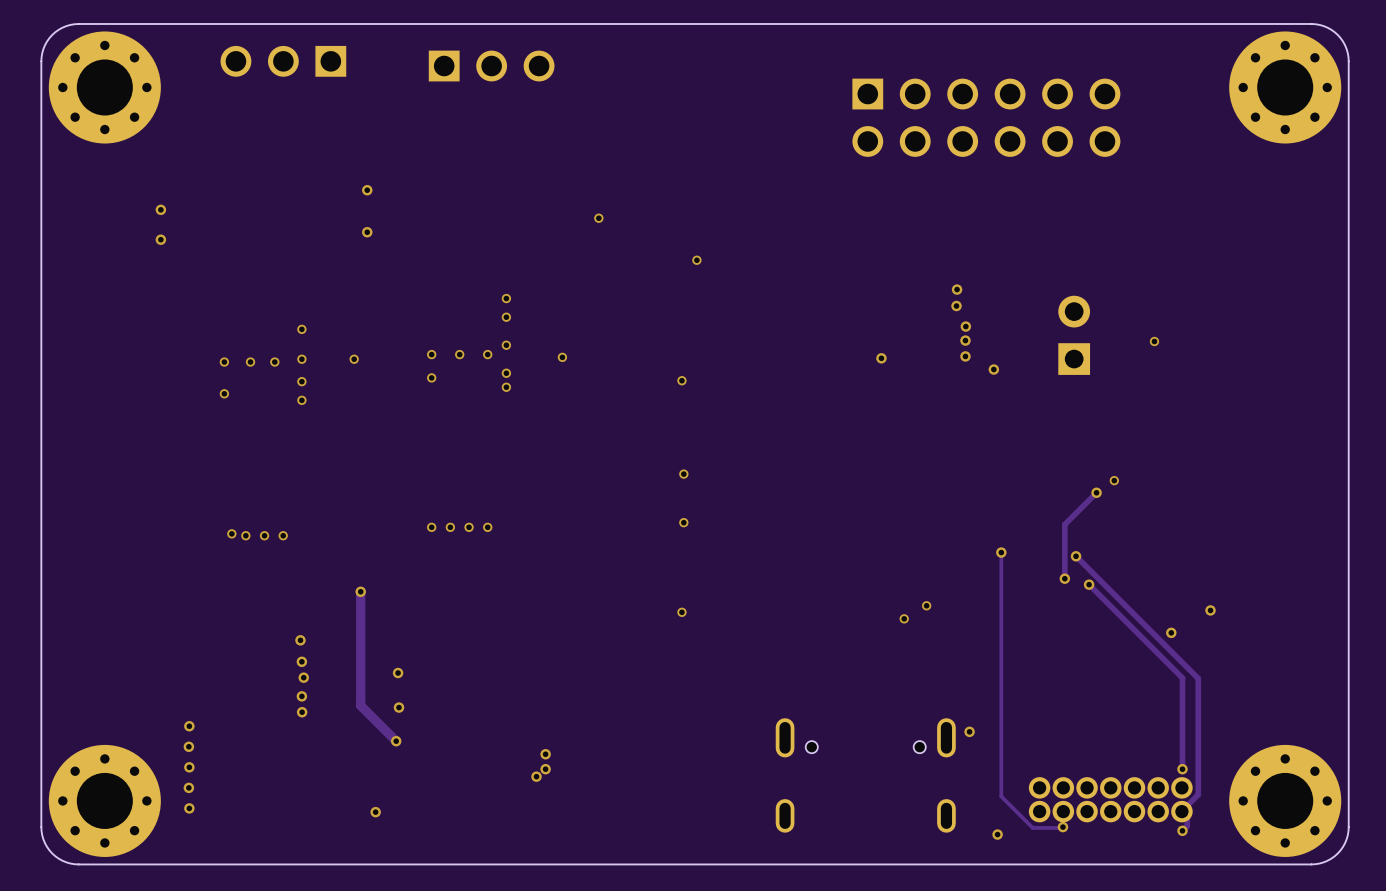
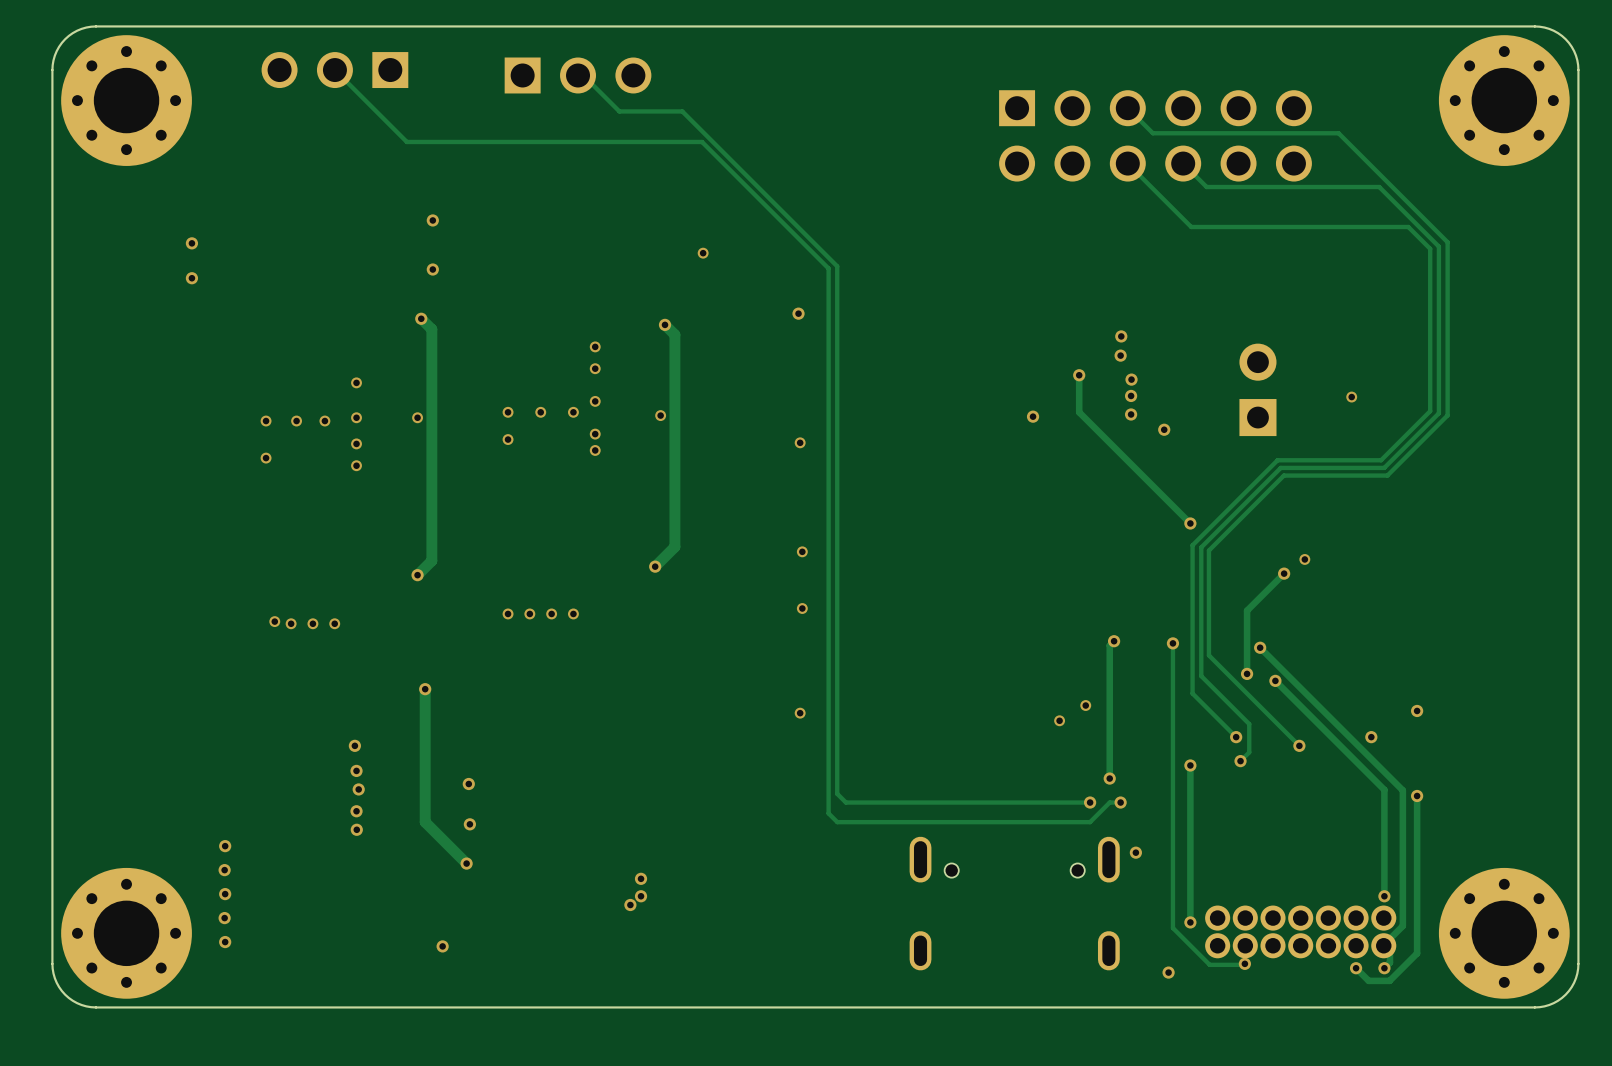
track: none -> (334, 70) (406, 141) (702, 141) (828, 268) (828, 813) (837, 822) (1090, 822) (1109, 802) (1120, 802)
track: none -> (578, 70) (619, 111) (682, 111) (837, 266) (837, 793) (845, 802) (1090, 802)
track: none -> (1127, 108) (1152, 133) (1338, 133) (1447, 242) (1447, 415) (1387, 475) (1283, 475) (1208, 550) (1208, 655) (1299, 745)
track: none -> (1127, 163) (1191, 227) (1408, 227) (1430, 248) (1430, 411) (1381, 460) (1277, 460) (1192, 545) (1192, 693) (1236, 737)
track: none -> (1183, 163) (1206, 187) (1379, 187) (1438, 246) (1438, 413) (1384, 467) (1280, 467) (1201, 547) (1201, 676) (1249, 724) (1249, 752) (1240, 761)
via: (696, 260) -> none
via: none -> (798, 313)
track: none -> (421, 318) (431, 329) (431, 560) (417, 575)
via: none -> (421, 318)
track: none -> (665, 324) (674, 334) (674, 546) (655, 566)
via: none -> (665, 324)
track: none -> (1079, 375) (1079, 412) (1190, 523)
via: none -> (1079, 375)
via: none -> (1190, 523)
via: none -> (655, 566)
via: none -> (417, 575)
track: none -> (1114, 641) (1109, 645) (1109, 778)
via: none -> (1114, 641)
via: none -> (1236, 737)
via: none -> (1299, 745)
via: none -> (1240, 761)
track: none -> (1190, 765) (1190, 922)
via: none -> (1190, 765)
via: none -> (1109, 778)
track: none -> (1417, 795) (1417, 953) (1389, 980) (1368, 980) (1356, 968)
via: none -> (1417, 795)
via: none -> (1090, 802)
via: none -> (1120, 802)
via: none -> (1190, 922)
via: none -> (1356, 968)

